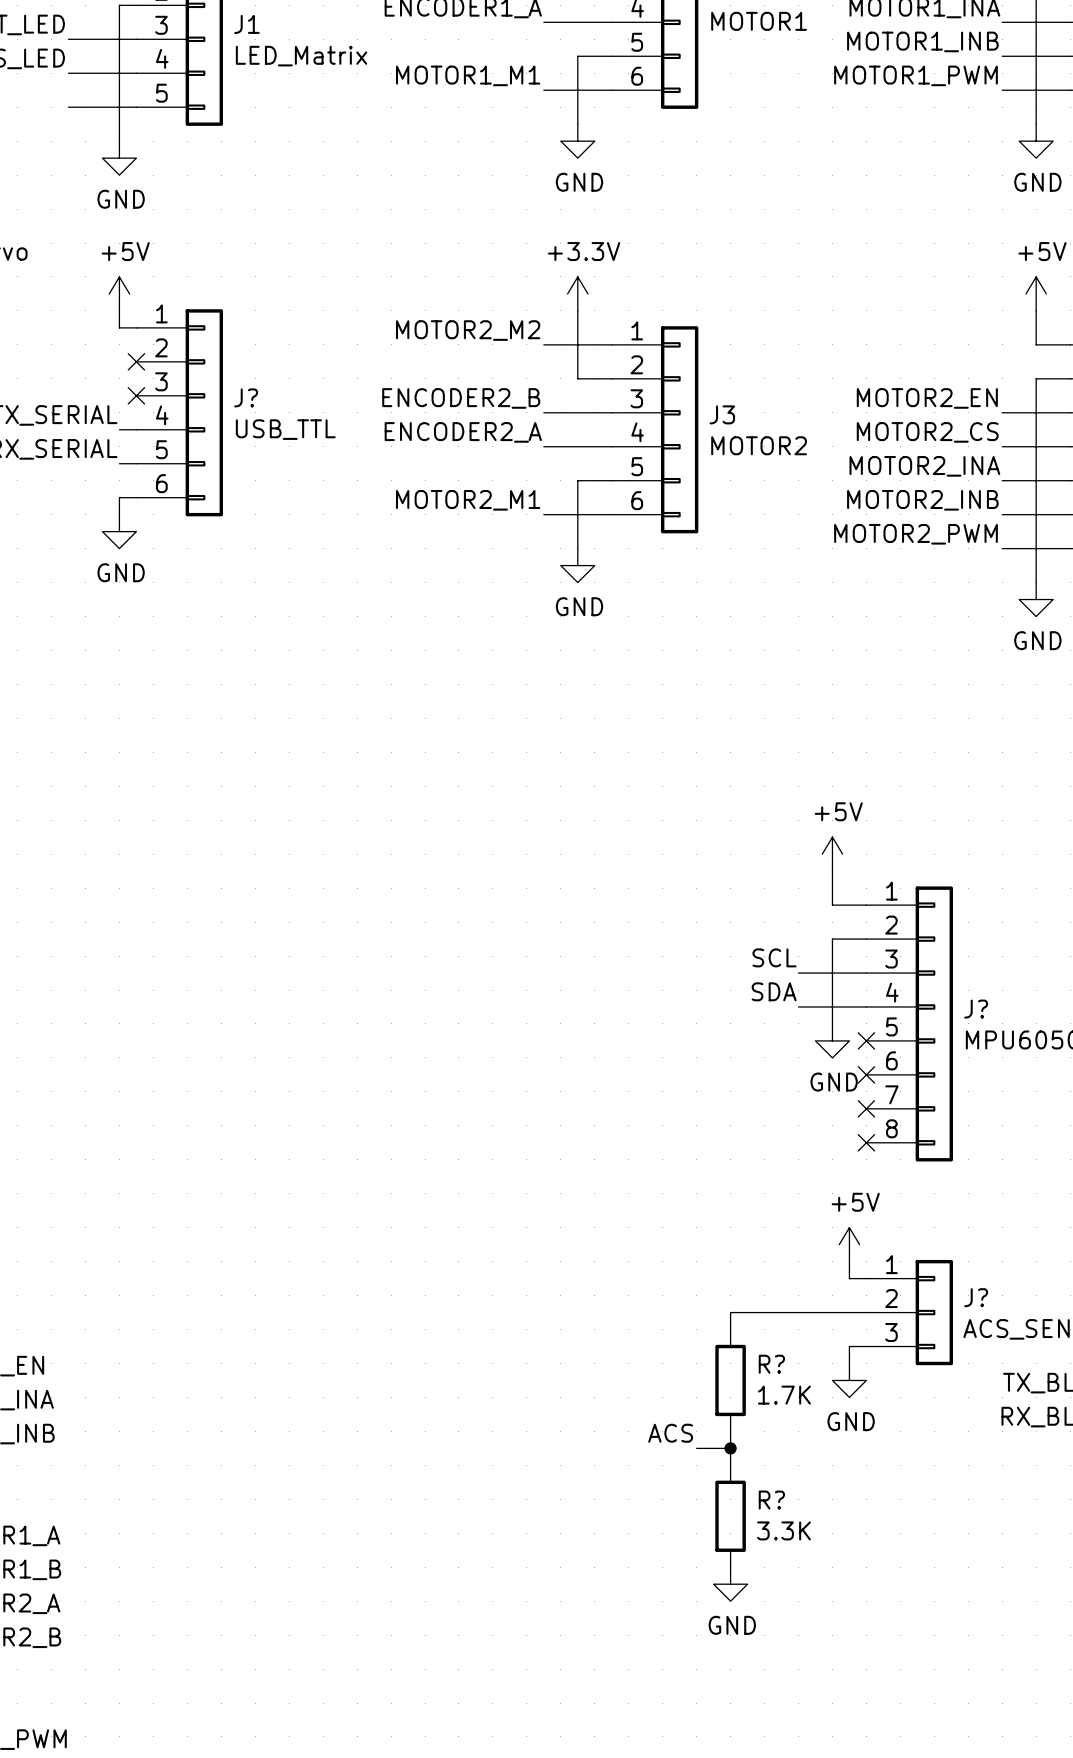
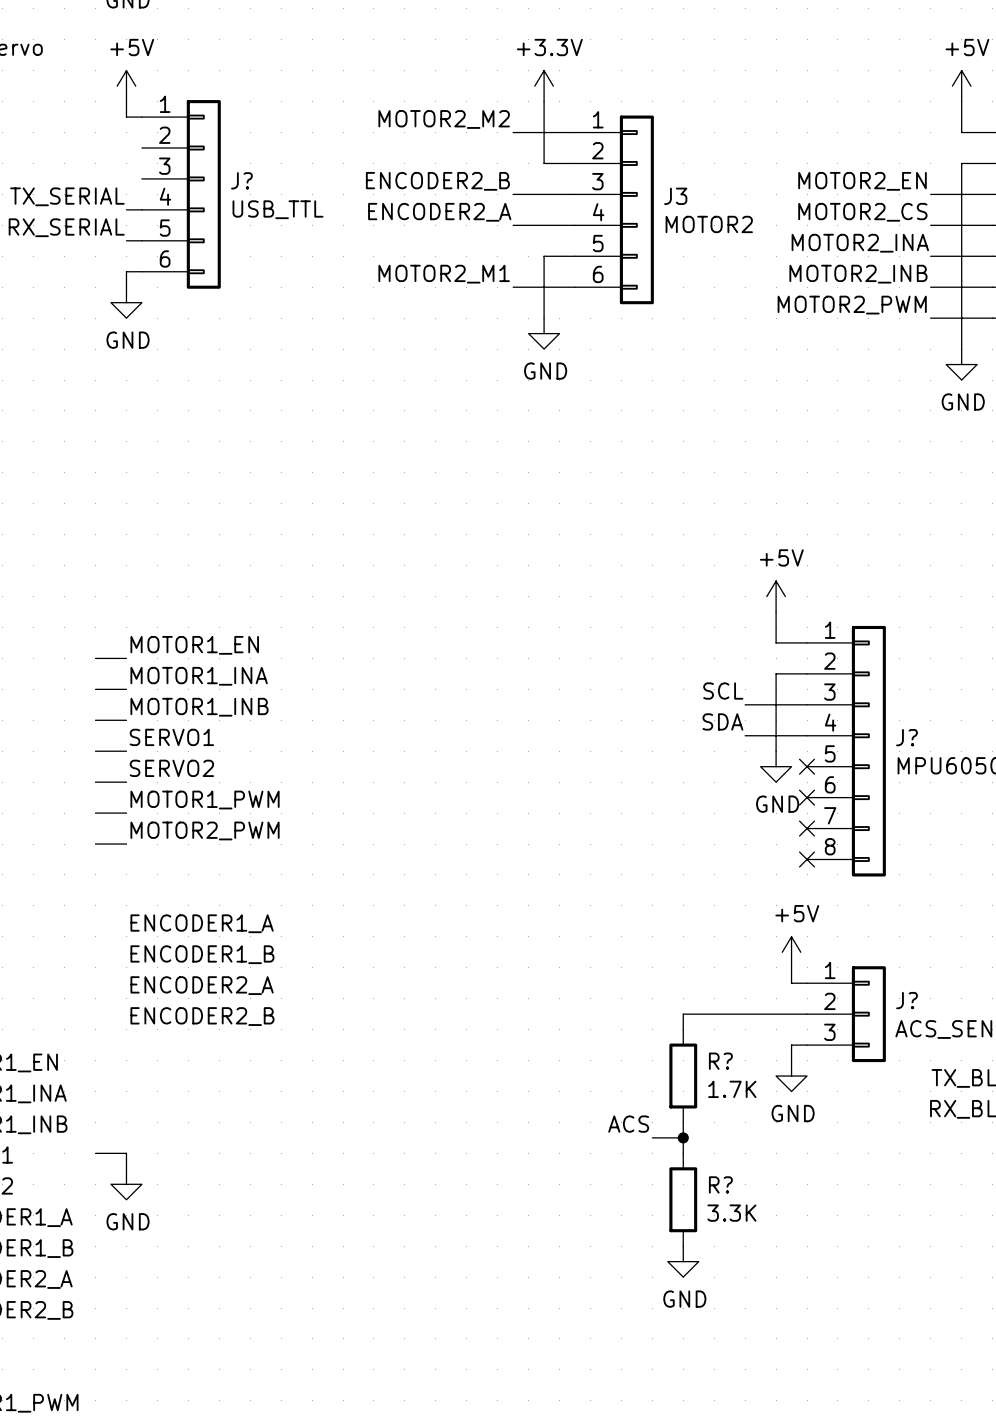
no-connect mark: (136, 361) -> none
no-connect mark: (136, 395) -> none
label: none -> MOTOR1_EN (194, 645)
wire: none -> (95, 658) (126, 658)
label: none -> MOTOR1_INA (199, 676)
wire: none -> (95, 689) (126, 689)
label: none -> MOTOR1_INB (199, 707)
wire: none -> (95, 720) (126, 720)
label: none -> SERVO1 (171, 737)
wire: none -> (95, 751) (126, 751)
label: none -> SERVO2 (171, 768)
wire: none -> (95, 782) (126, 782)
label: none -> MOTOR1_PWM (205, 800)
wire: none -> (95, 813) (126, 813)
label: none -> MOTOR2_PWM (205, 830)
wire: none -> (95, 844) (126, 844)
label: none -> ENCODER1_A (202, 923)
label: none -> ENCODER1_B (202, 954)
label: none -> ENCODER2_A (202, 985)
label: none -> ENCODER2_B (202, 1016)
wire: none -> (95, 1153) (126, 1153) (126, 1168)
power symbol: none -> GND (126, 1184)

